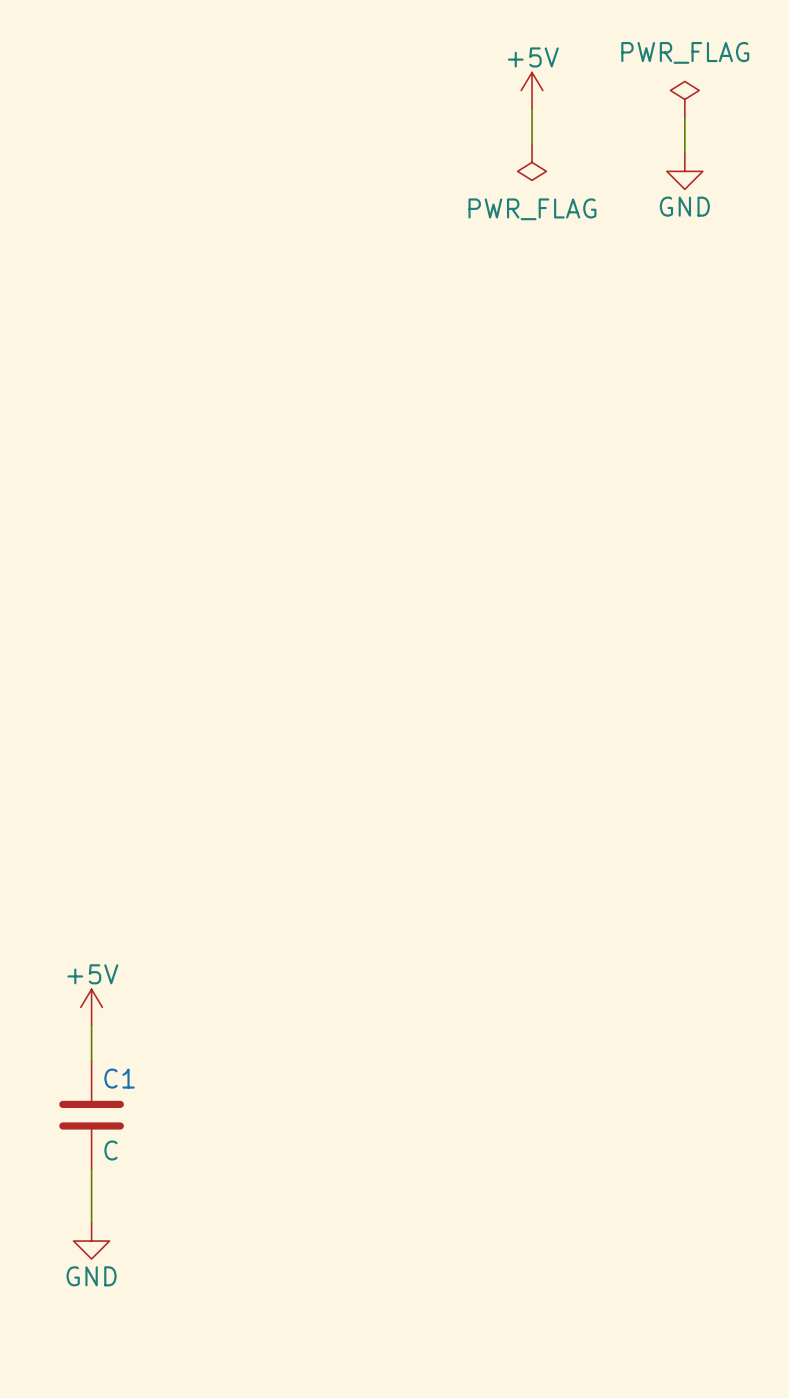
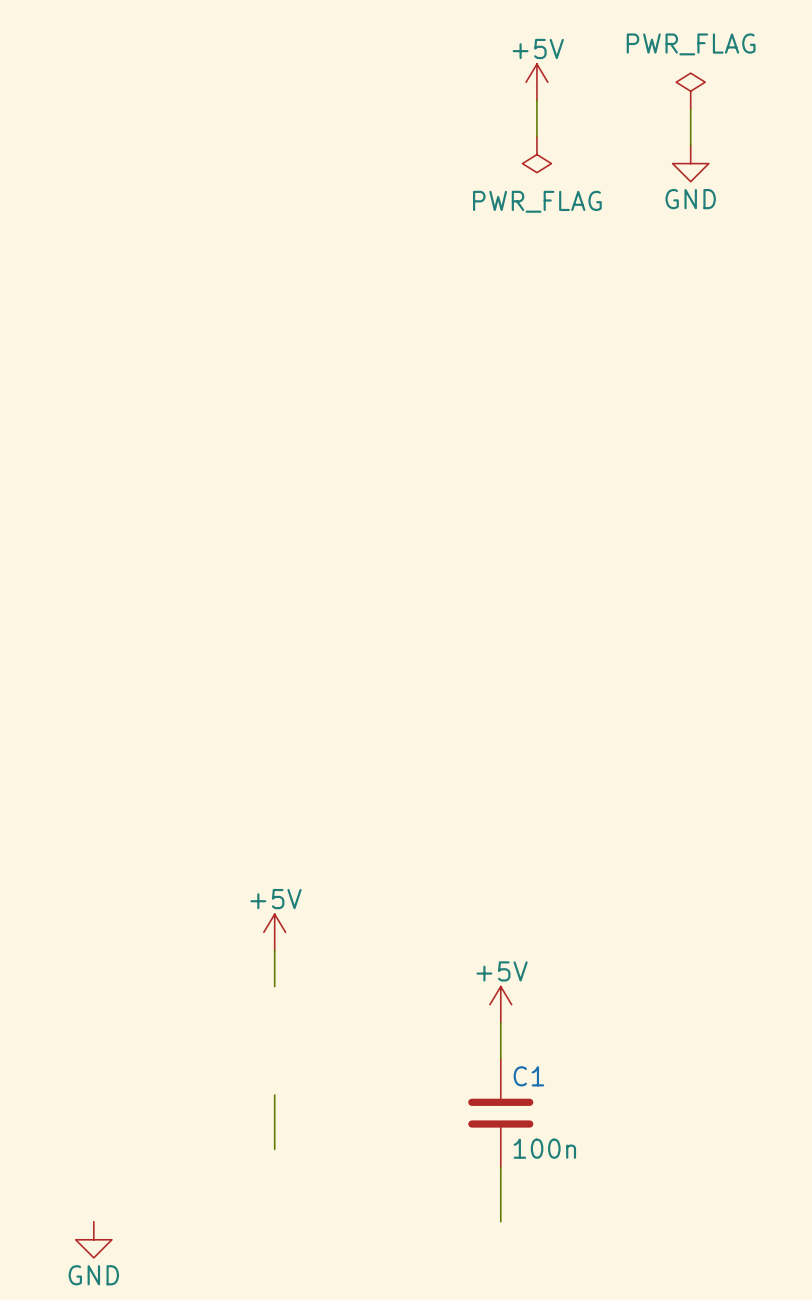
power symbol position: +5V (91, 1007) -> +5V (274, 932)
power symbol: none -> +5V (500, 1004)
wire: (91, 1025) (91, 1061) -> (274, 950) (274, 986)
wire: none -> (500, 1022) (500, 1058)
C1 position: (91, 1115) -> (500, 1113)
C1 value: C (110, 1150) -> 100n (544, 1148)
wire: (91, 1169) (91, 1223) -> (274, 1095) (274, 1149)
wire: none -> (500, 1167) (500, 1221)

